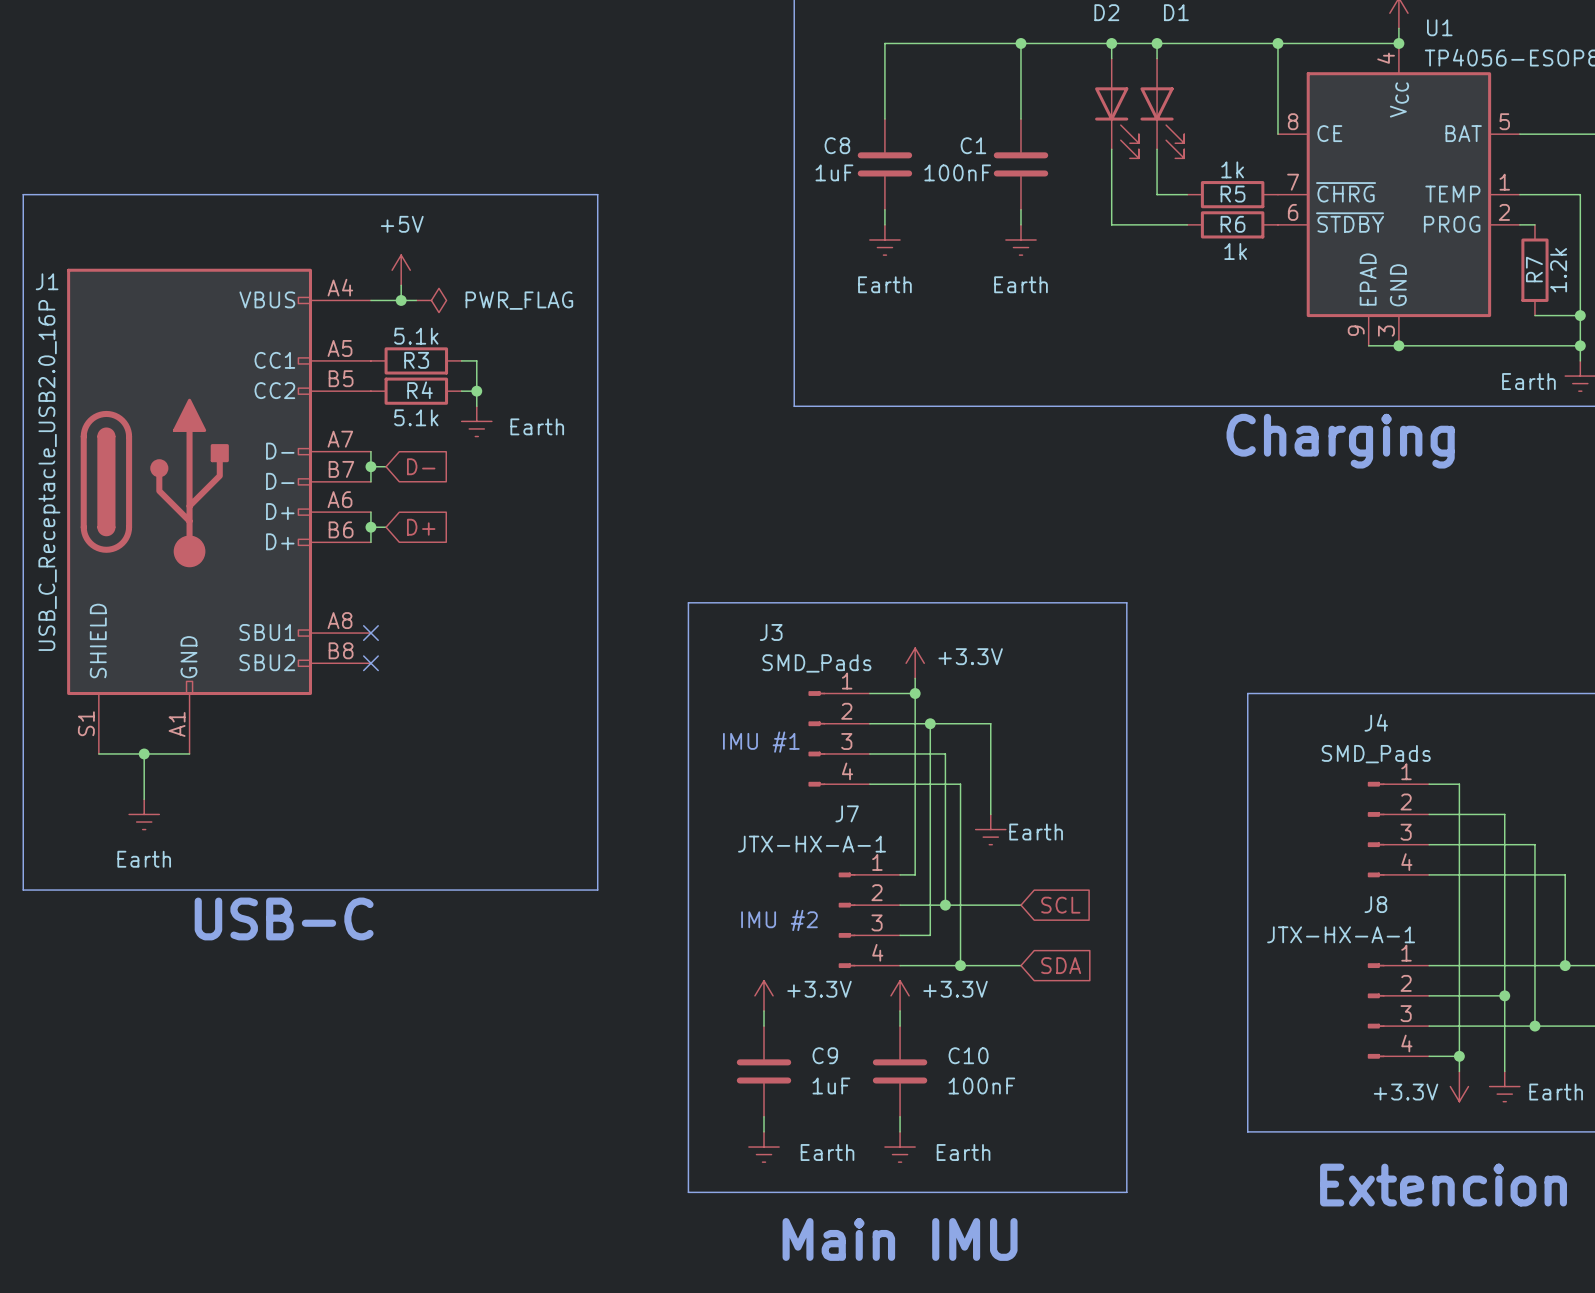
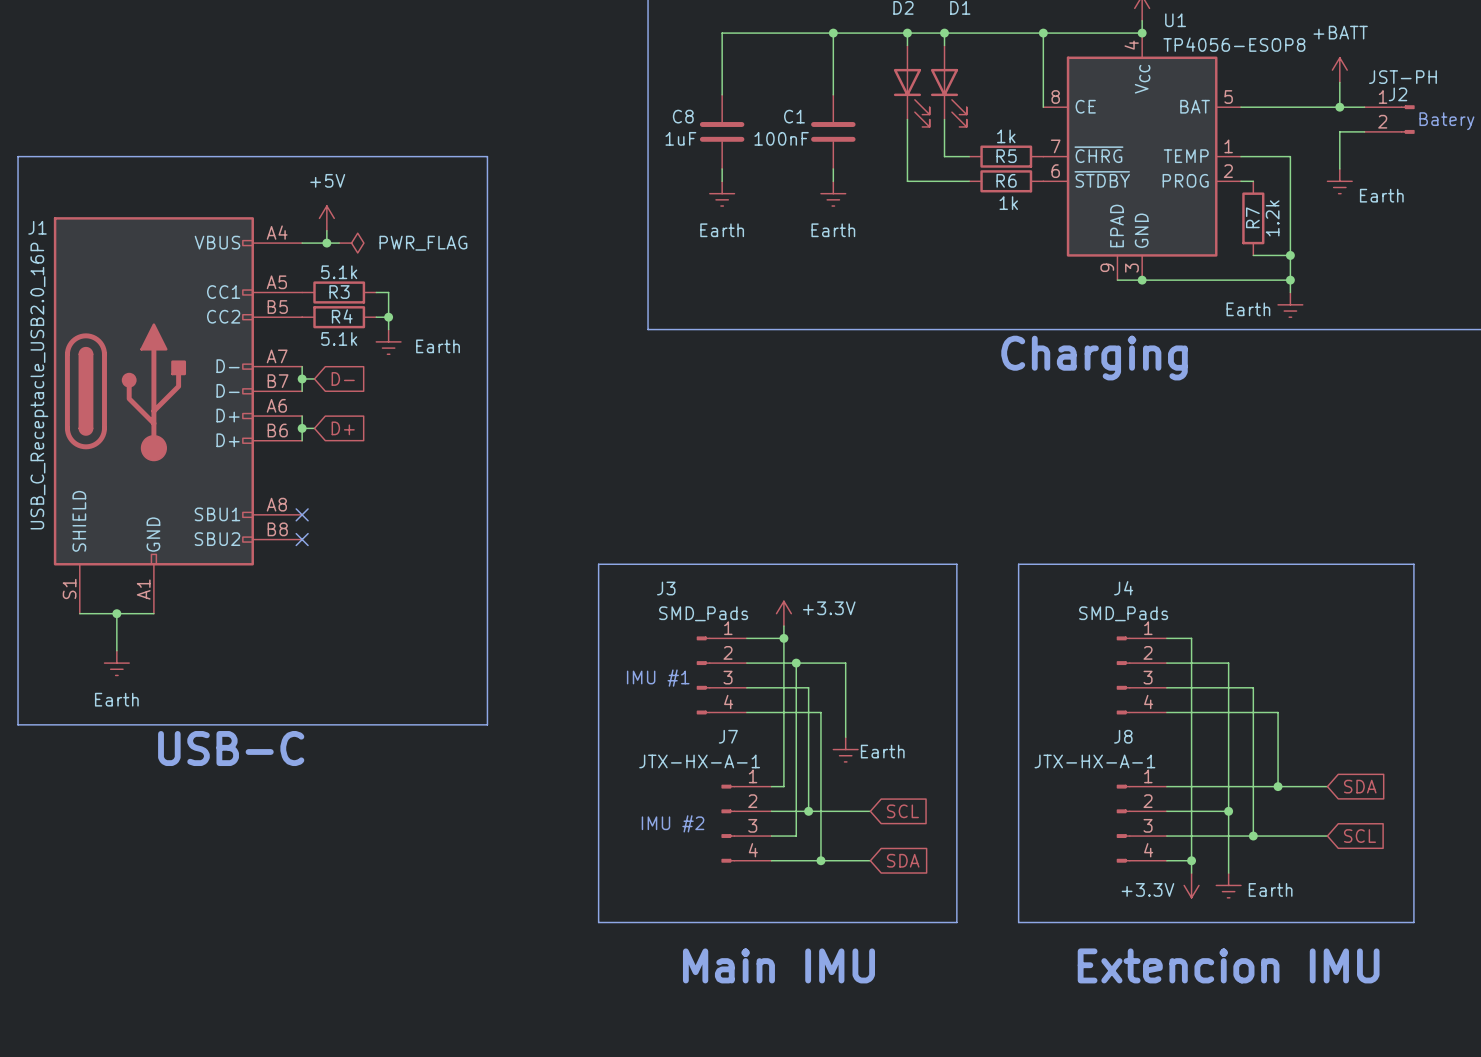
line: (688, 602) (688, 1192) (1126, 1192) (1126, 602) (688, 602) -> (598, 564) (598, 922) (956, 922) (956, 564) (598, 564)
power symbol position: +3.3V (915, 663) -> +3.3V (783, 613)
wire: (915, 678) (915, 874) (900, 874) -> none
junction: (915, 693) -> none
wire: (869, 723) (990, 723) (990, 814) -> (746, 663) (845, 663) (845, 737)
wire: (930, 723) (930, 935) (900, 935) -> (796, 663) (796, 836) (771, 836)
junction: (930, 723) -> none
J3 position: (839, 738) -> (721, 675)
text position: IMU #1 (761, 742) -> IMU #1 (658, 678)
wire: (869, 753) (945, 753) (945, 905) -> (746, 687) (808, 687) (808, 811)
junction: none -> (783, 638)
junction: none -> (796, 663)
power symbol position: Earth (990, 829) -> Earth (845, 749)
wire: none -> (746, 712) (820, 712) (820, 860)
wire: (900, 905) (1020, 905) -> (771, 811) (870, 811)
junction: (945, 905) -> none
global label position: SCL (1060, 905) -> SCL (902, 811)
text position: IMU #2 (779, 920) -> IMU #2 (673, 823)
J7 position: (869, 920) -> (746, 823)
wire: (960, 965) (1020, 965) -> none
junction position: (960, 965) -> (808, 811)
global label position: SDA (1061, 965) -> SDA (903, 860)
power symbol: +3.3V (764, 995) -> none
power symbol: +3.3V (900, 995) -> none
wire: (764, 1010) (764, 1026) -> none
wire: (900, 1010) (900, 1026) -> (783, 626) (783, 638)
wire: none -> (771, 860) (870, 860)
junction: none -> (820, 860)
C9: 1uF (764, 1071) -> none
C10: 100nF (900, 1071) -> none
wire: (764, 1116) (764, 1131) -> none
wire: (900, 1116) (900, 1131) -> none
power symbol: Earth (764, 1147) -> none
power symbol: Earth (900, 1147) -> none
text position: Main IMU (900, 1239) -> Main IMU (778, 965)

